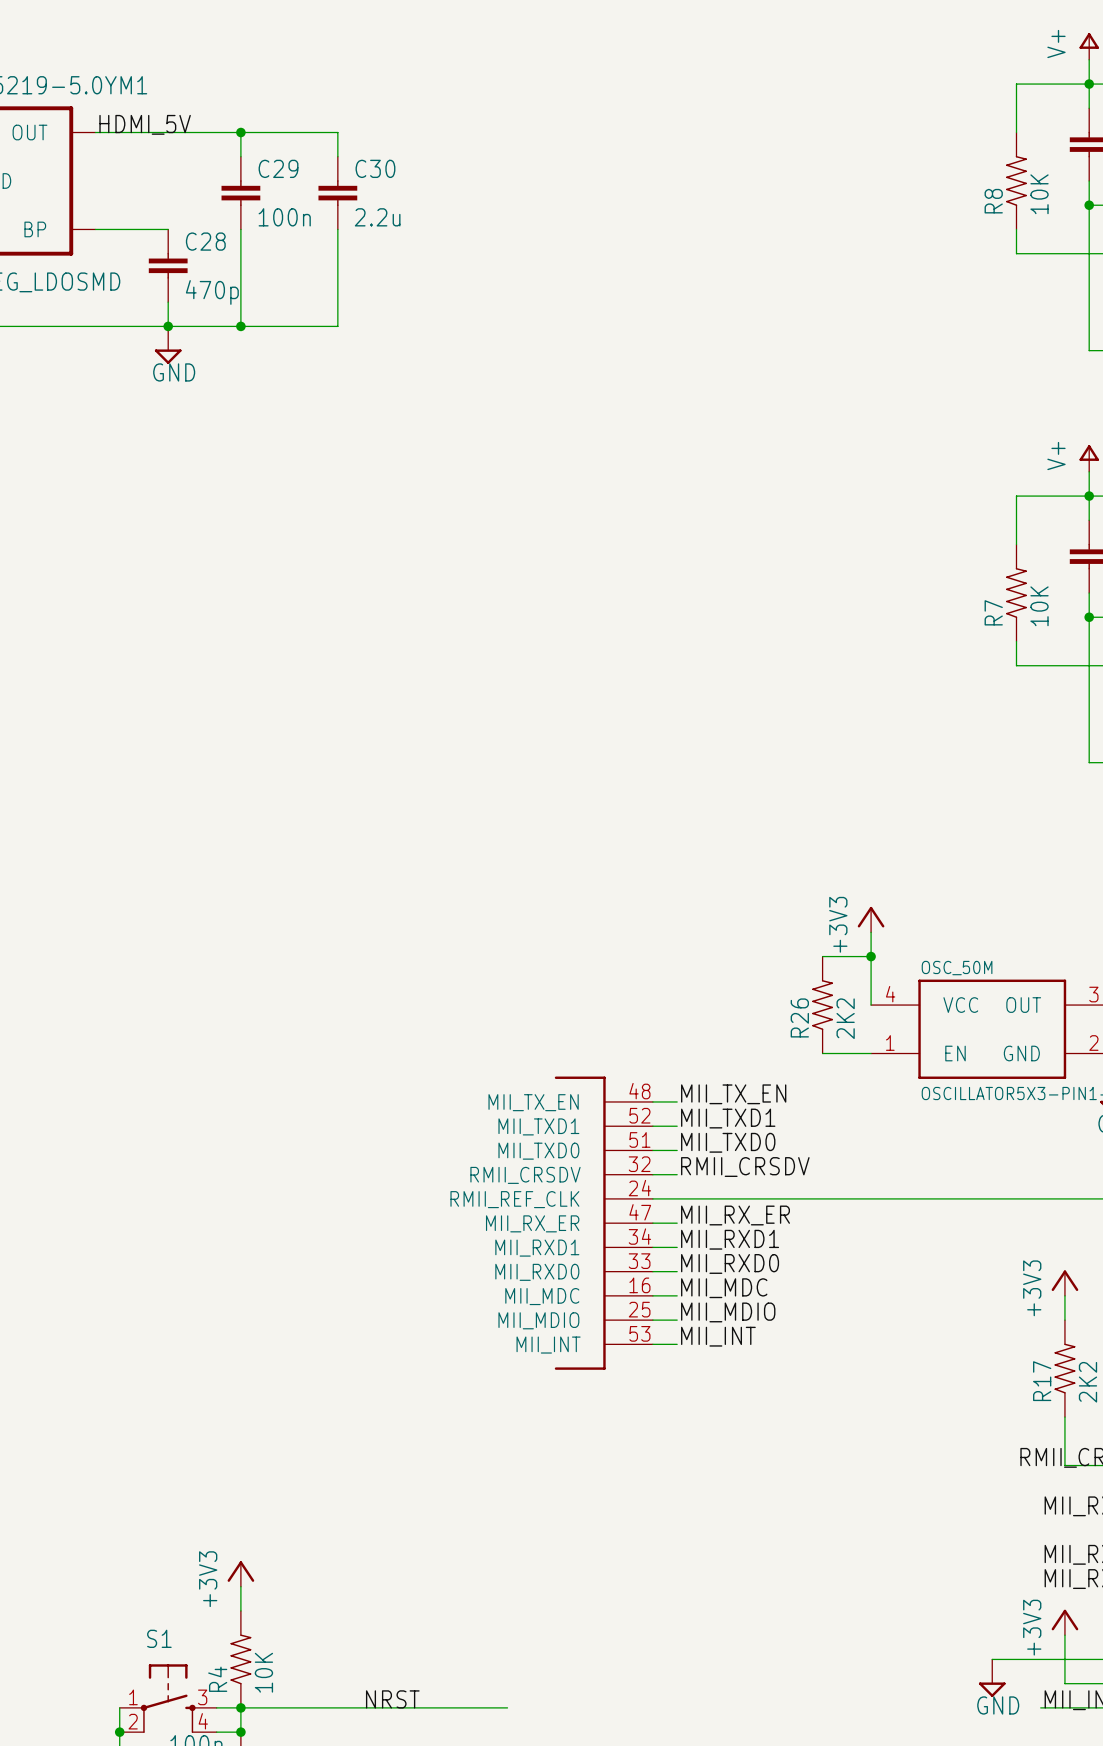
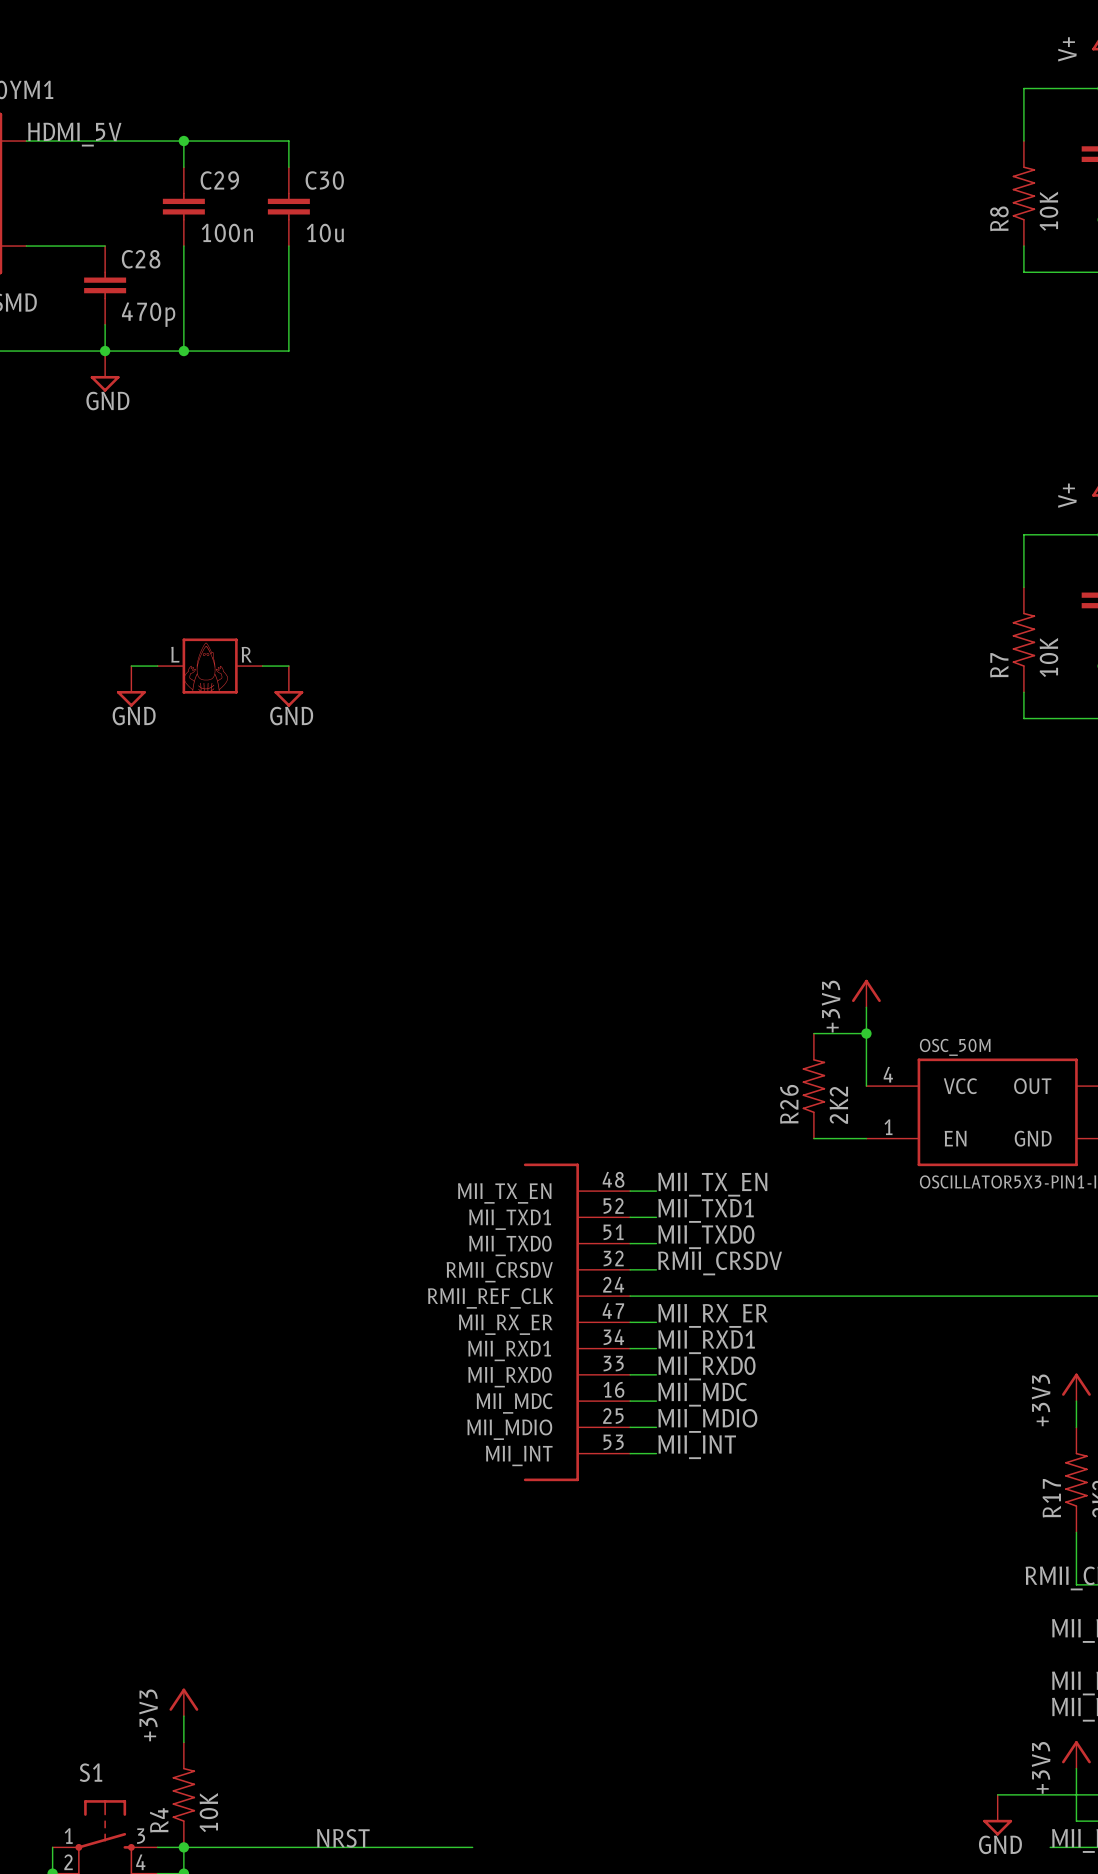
C30 value: 2.2u (377, 217) -> 10u (325, 233)
wire: none -> (131, 666) (157, 666)
part: none -> (210, 666)
wire: none -> (262, 666) (288, 666)
power symbol: none -> GND (131, 686)
power symbol: none -> GND (288, 686)

